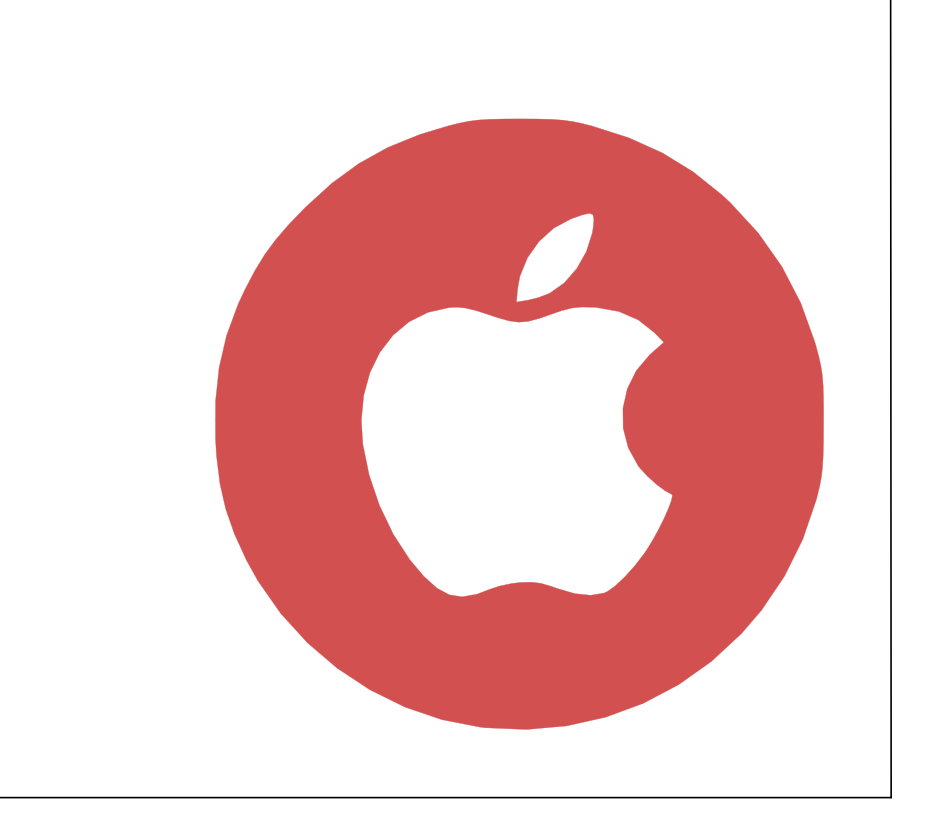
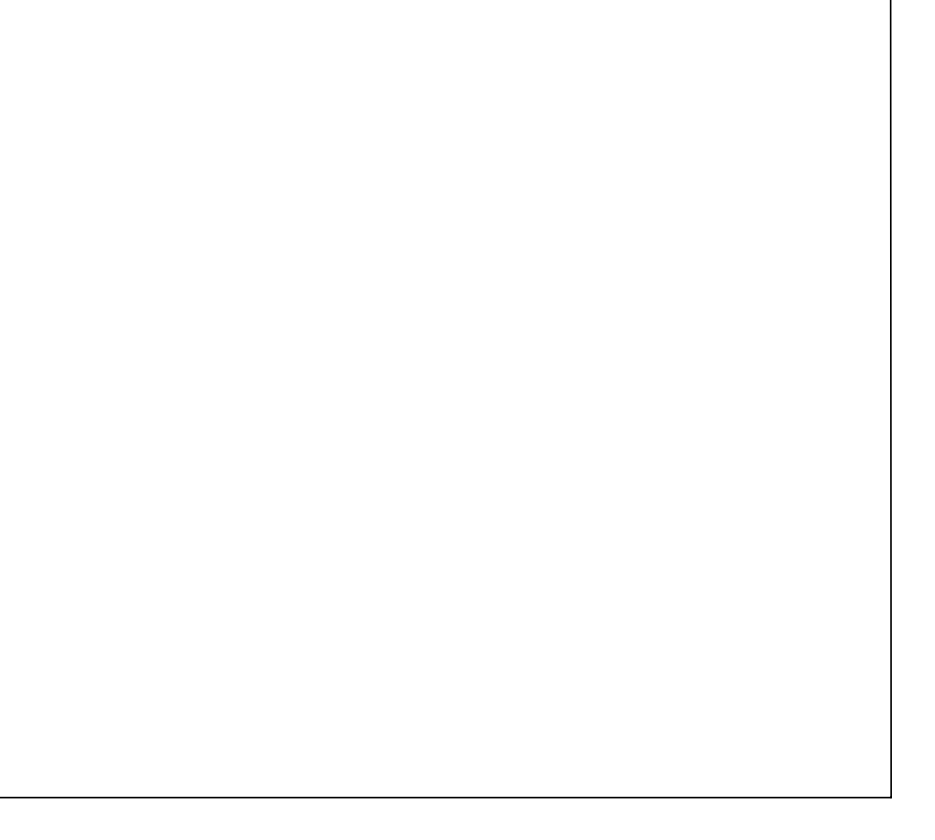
drawing: [215, 118, 824, 730] -> none

